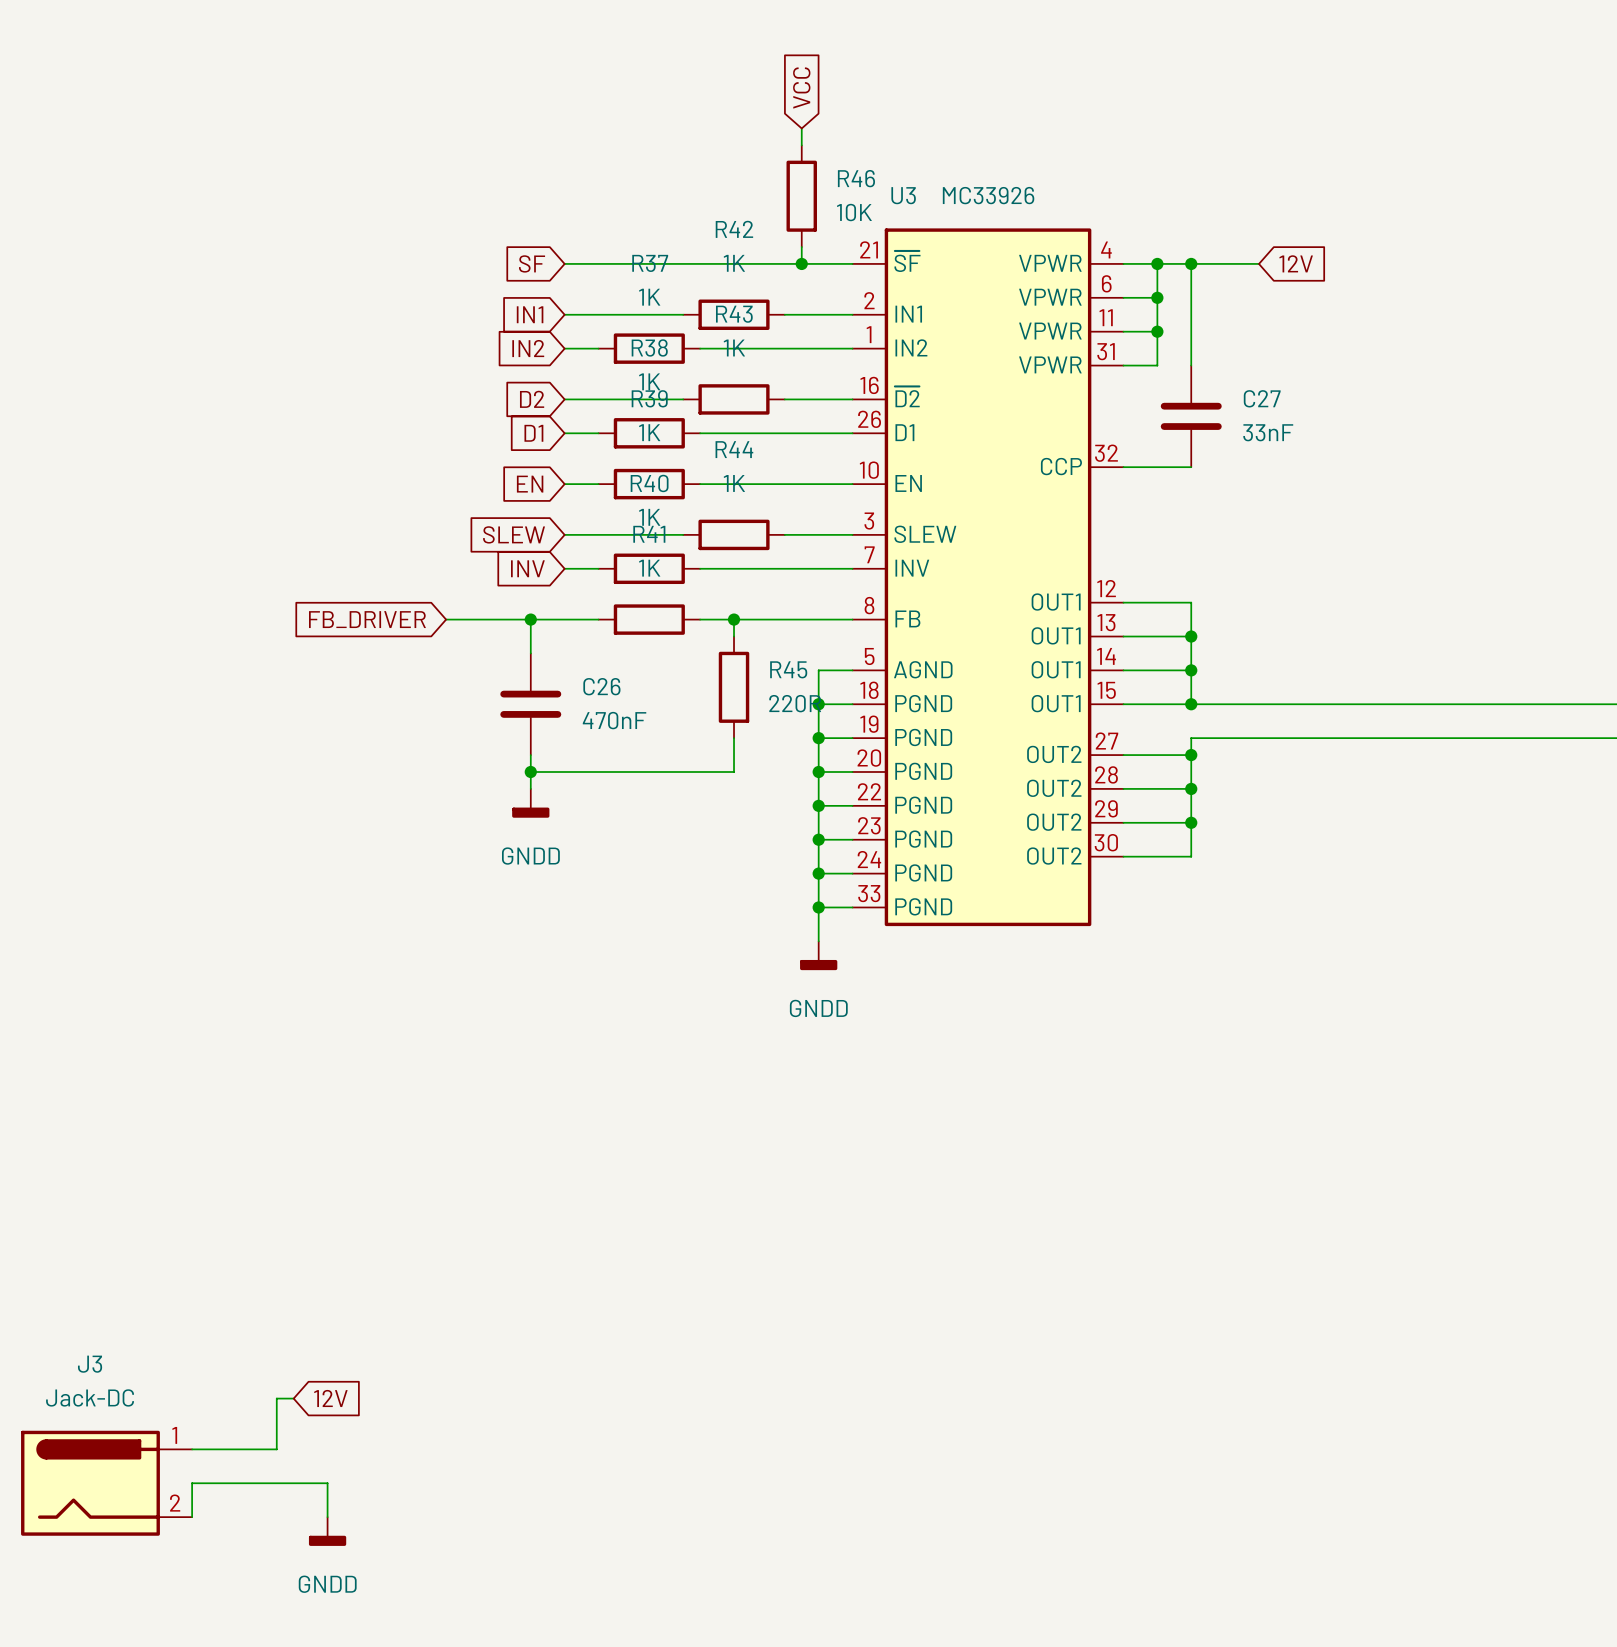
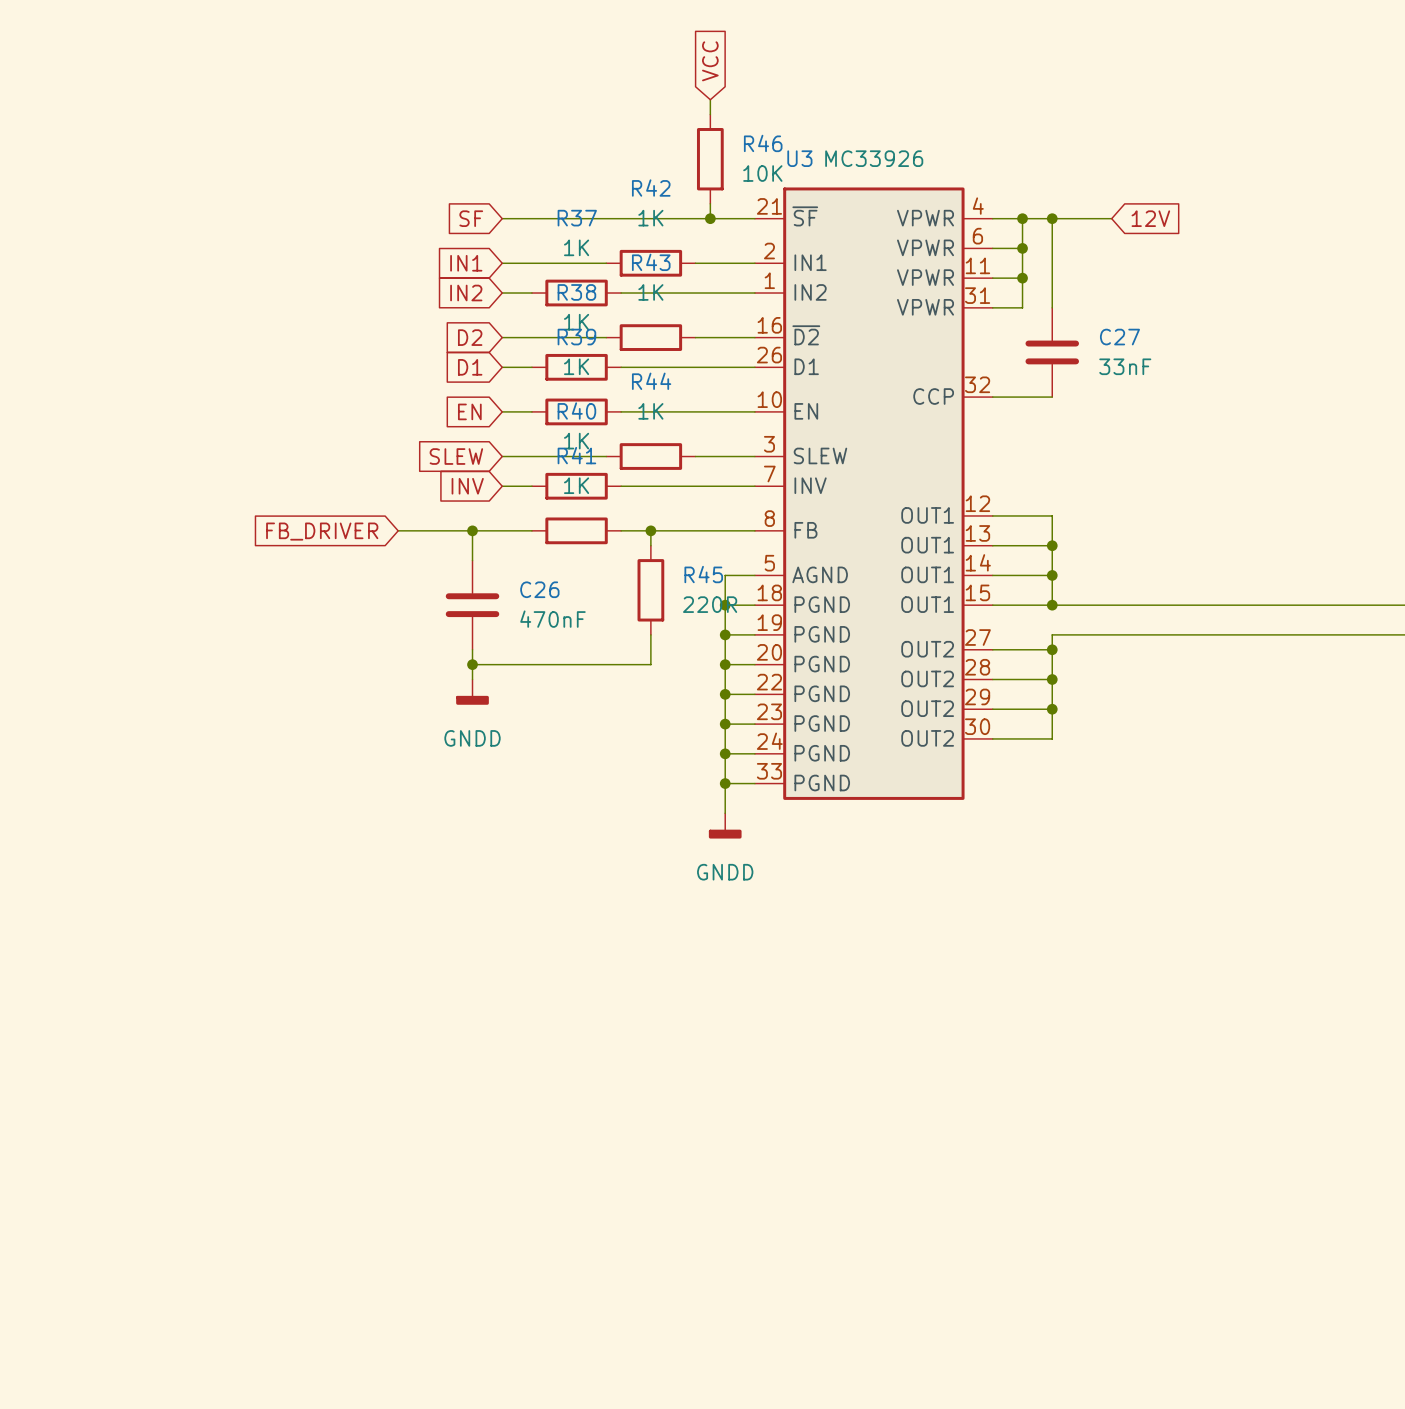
wire: (293, 1398) (276, 1398) (276, 1449) (192, 1449) -> none
global label: 12V (330, 1398) -> none
J3: Jack-DC (106, 1483) -> none
wire: (192, 1517) (192, 1483) (327, 1483) (327, 1517) -> none
power symbol: GNDD (327, 1531) -> none

